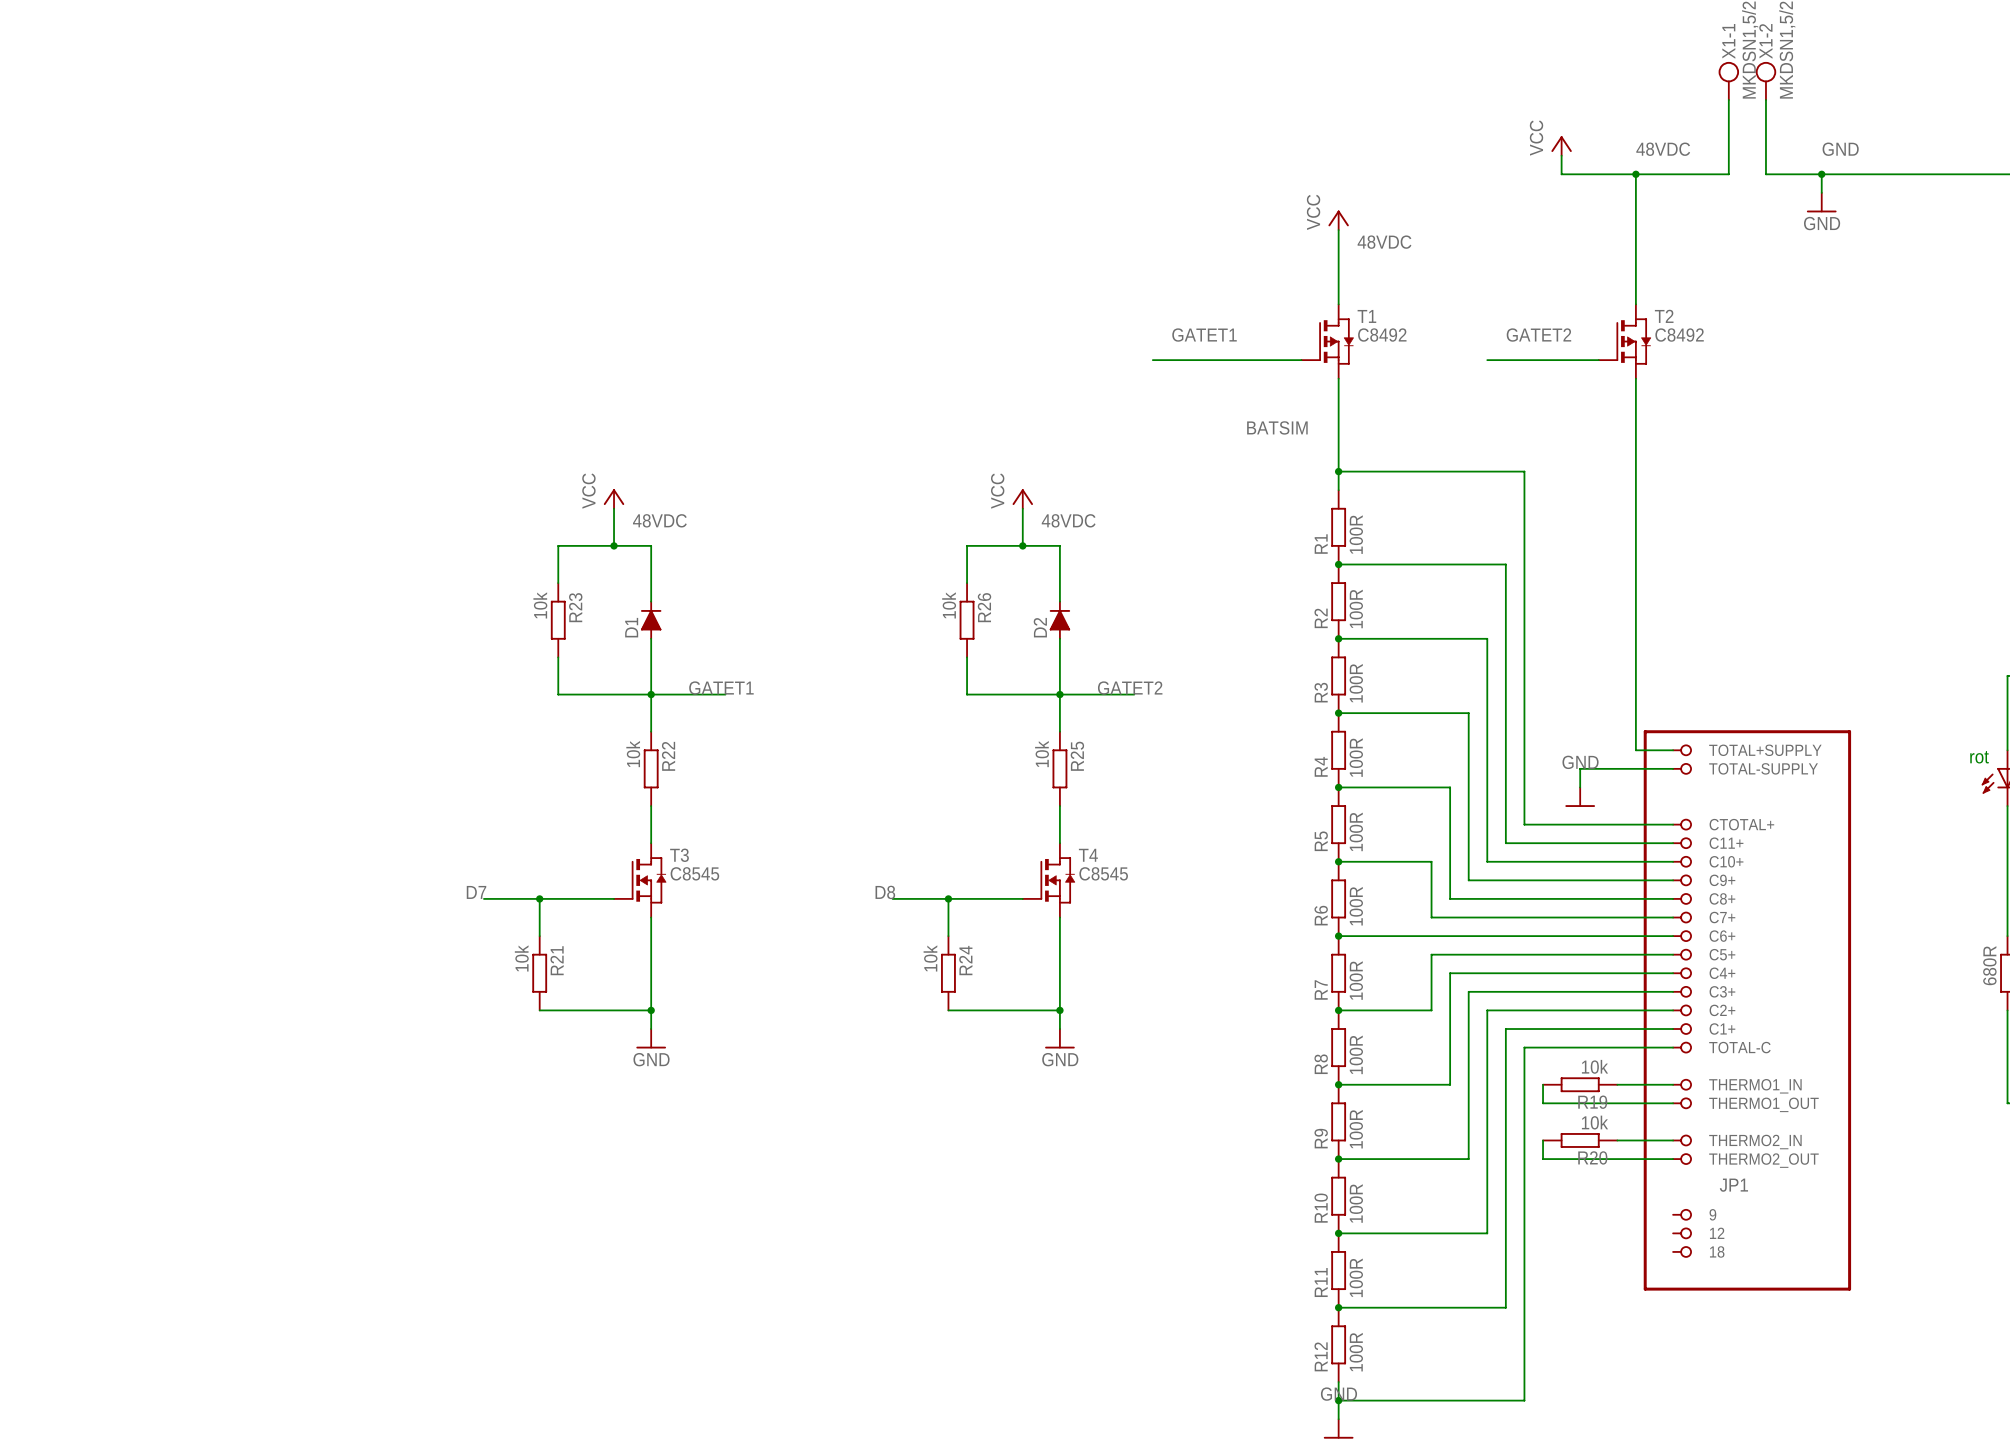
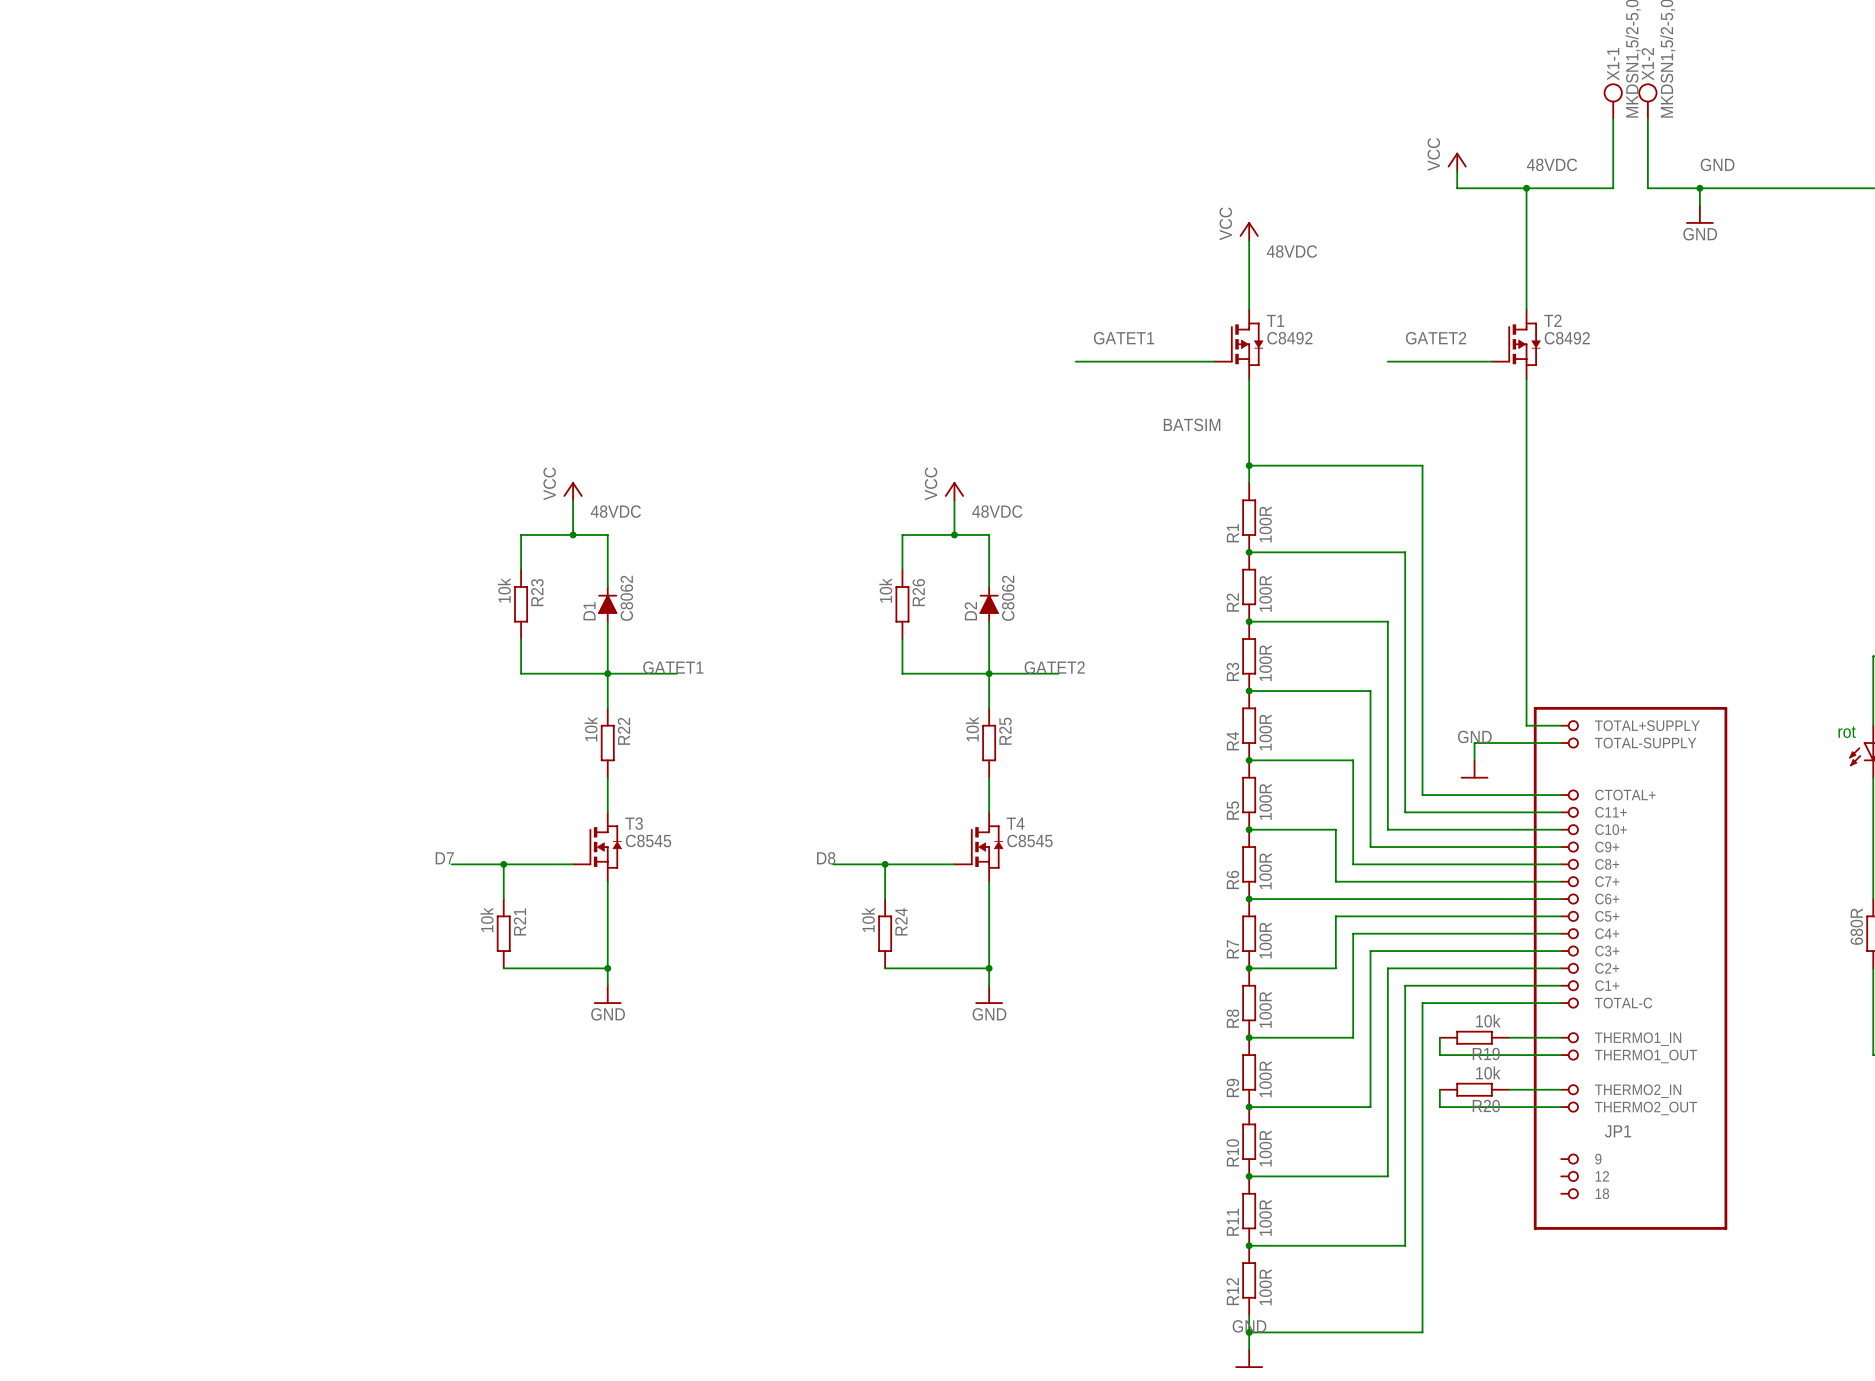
D1 value: none -> C8062 (626, 598)
D2 value: none -> C8062 (1008, 598)

